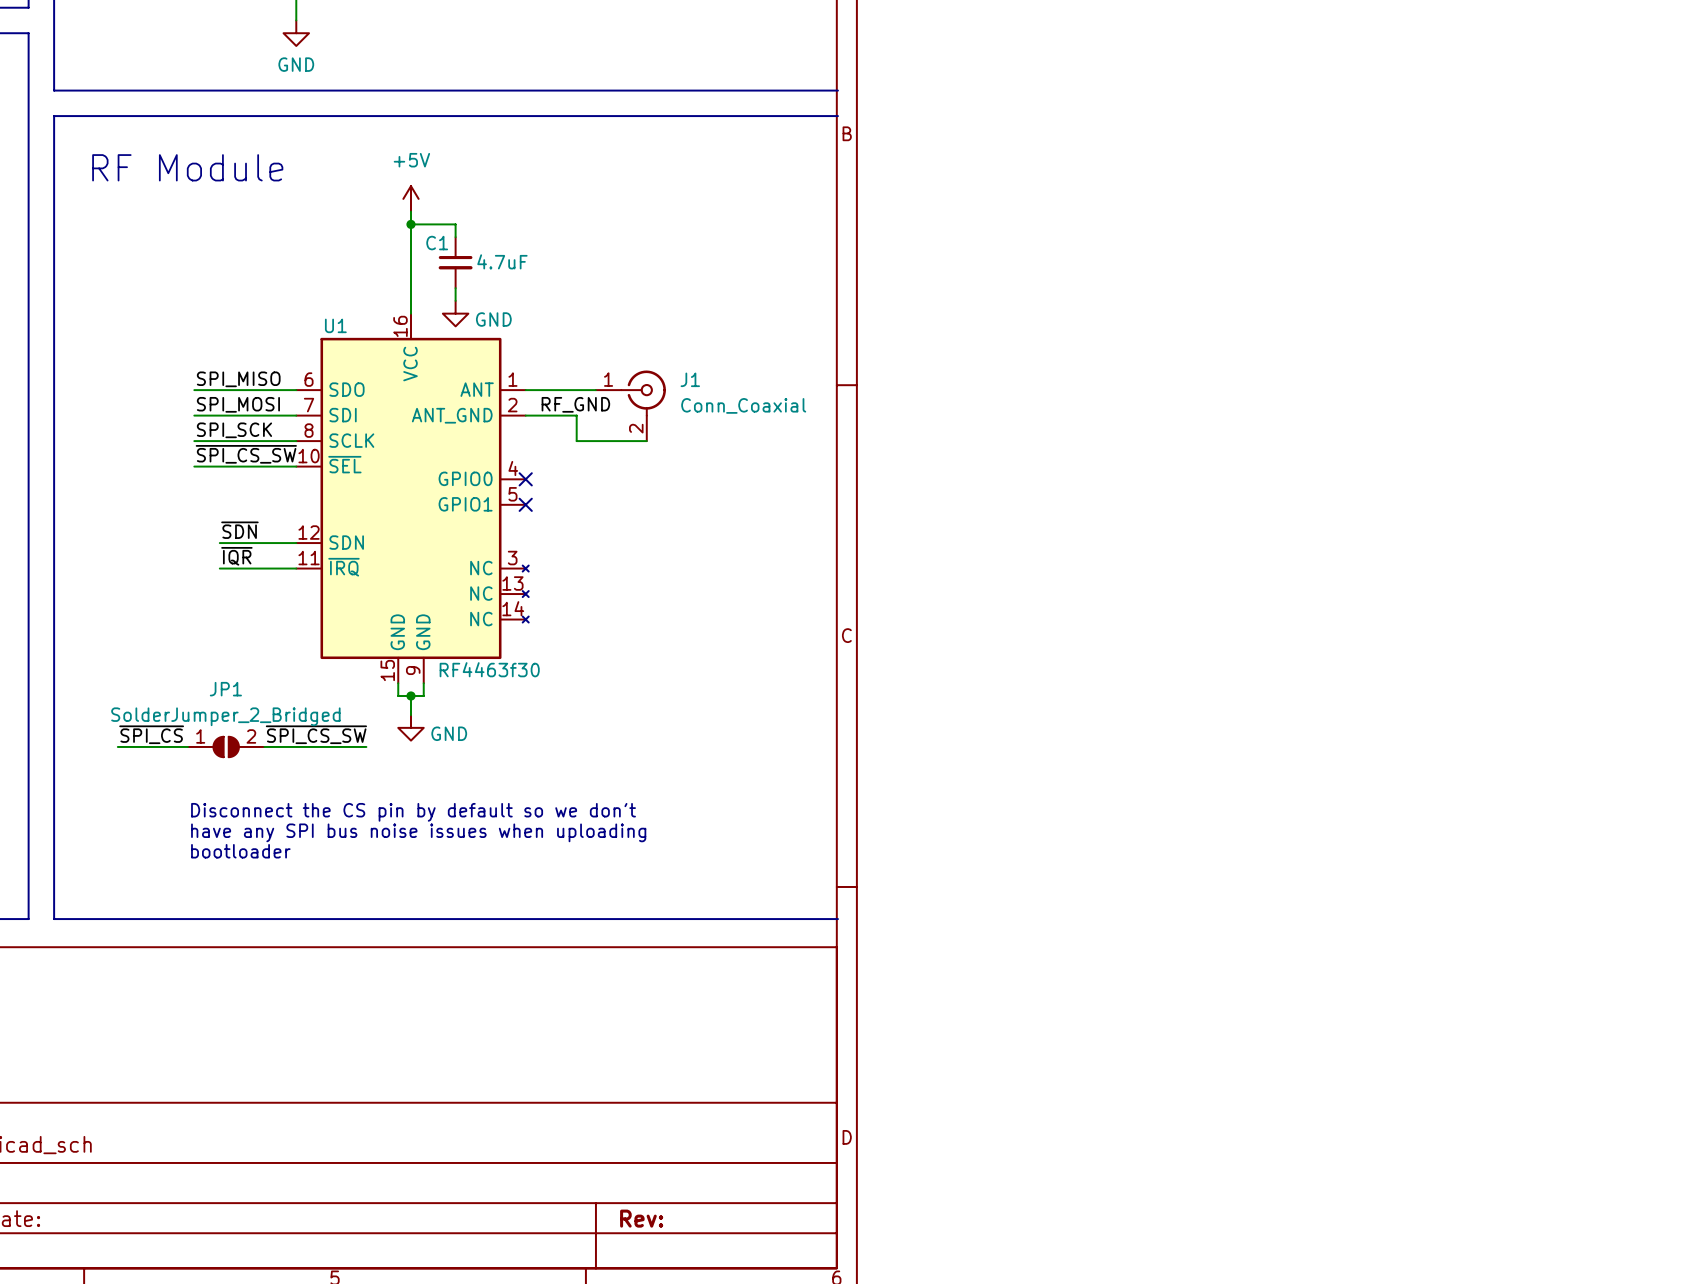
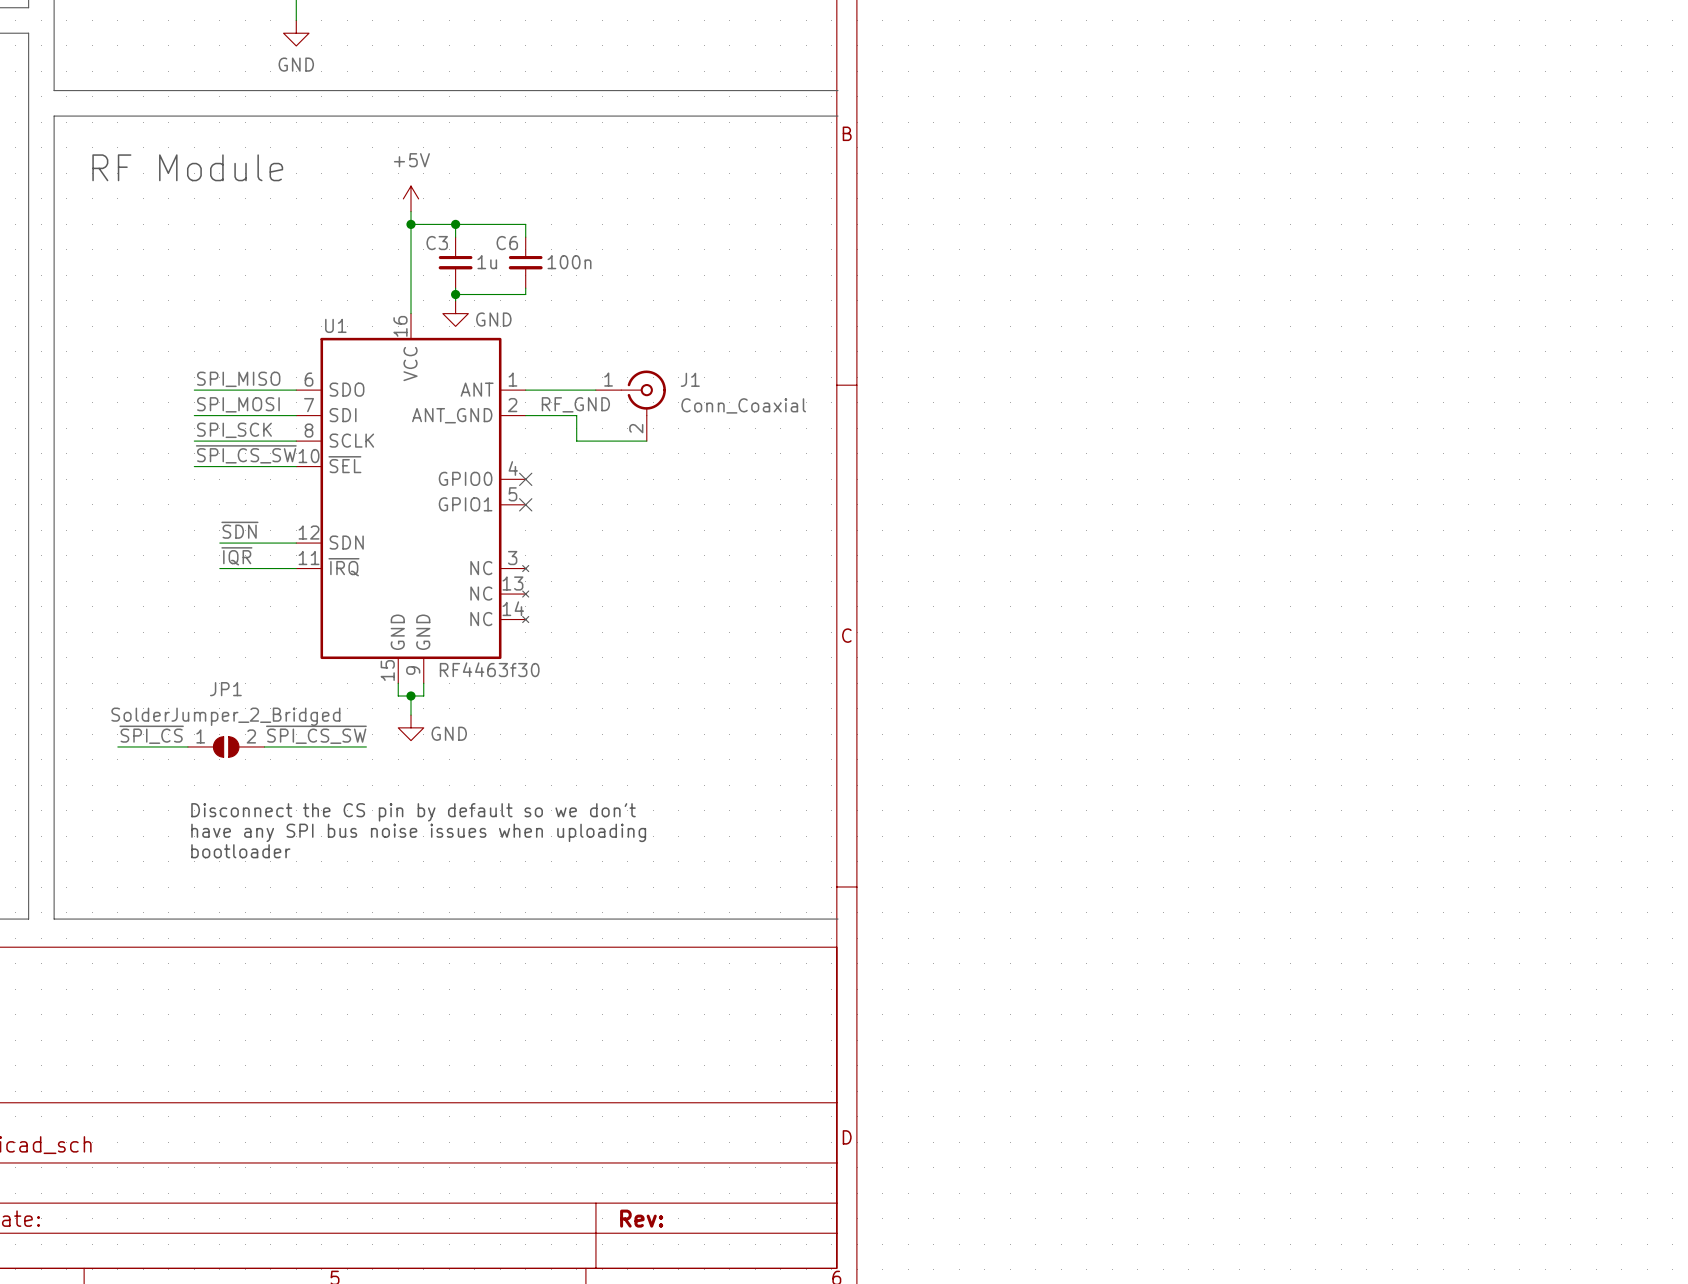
wire: none -> (455, 224) (525, 224) (525, 237)
junction: none -> (455, 224)
C1 name: C1 (437, 243) -> C3 (437, 243)
C1 value: 4.7uF (502, 261) -> 1u (487, 262)
C6: none -> 100n (525, 262)
wire: none -> (525, 288) (525, 294) (455, 294)
junction: none -> (455, 294)

